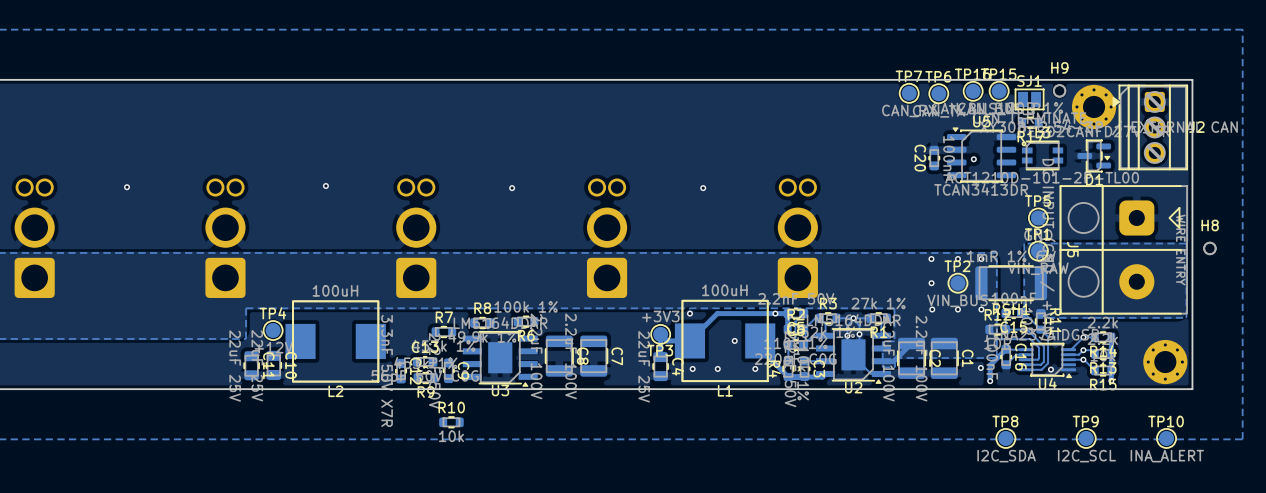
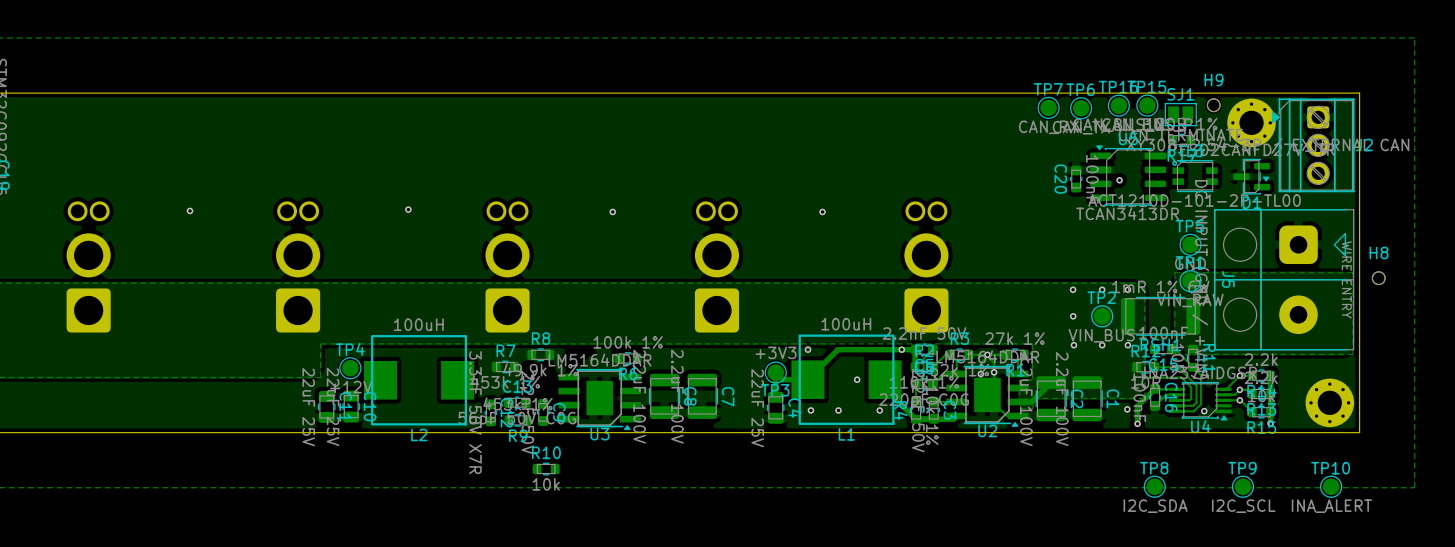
R8 position: (482, 322) -> (540, 354)
R7 position: (443, 332) -> (505, 366)

